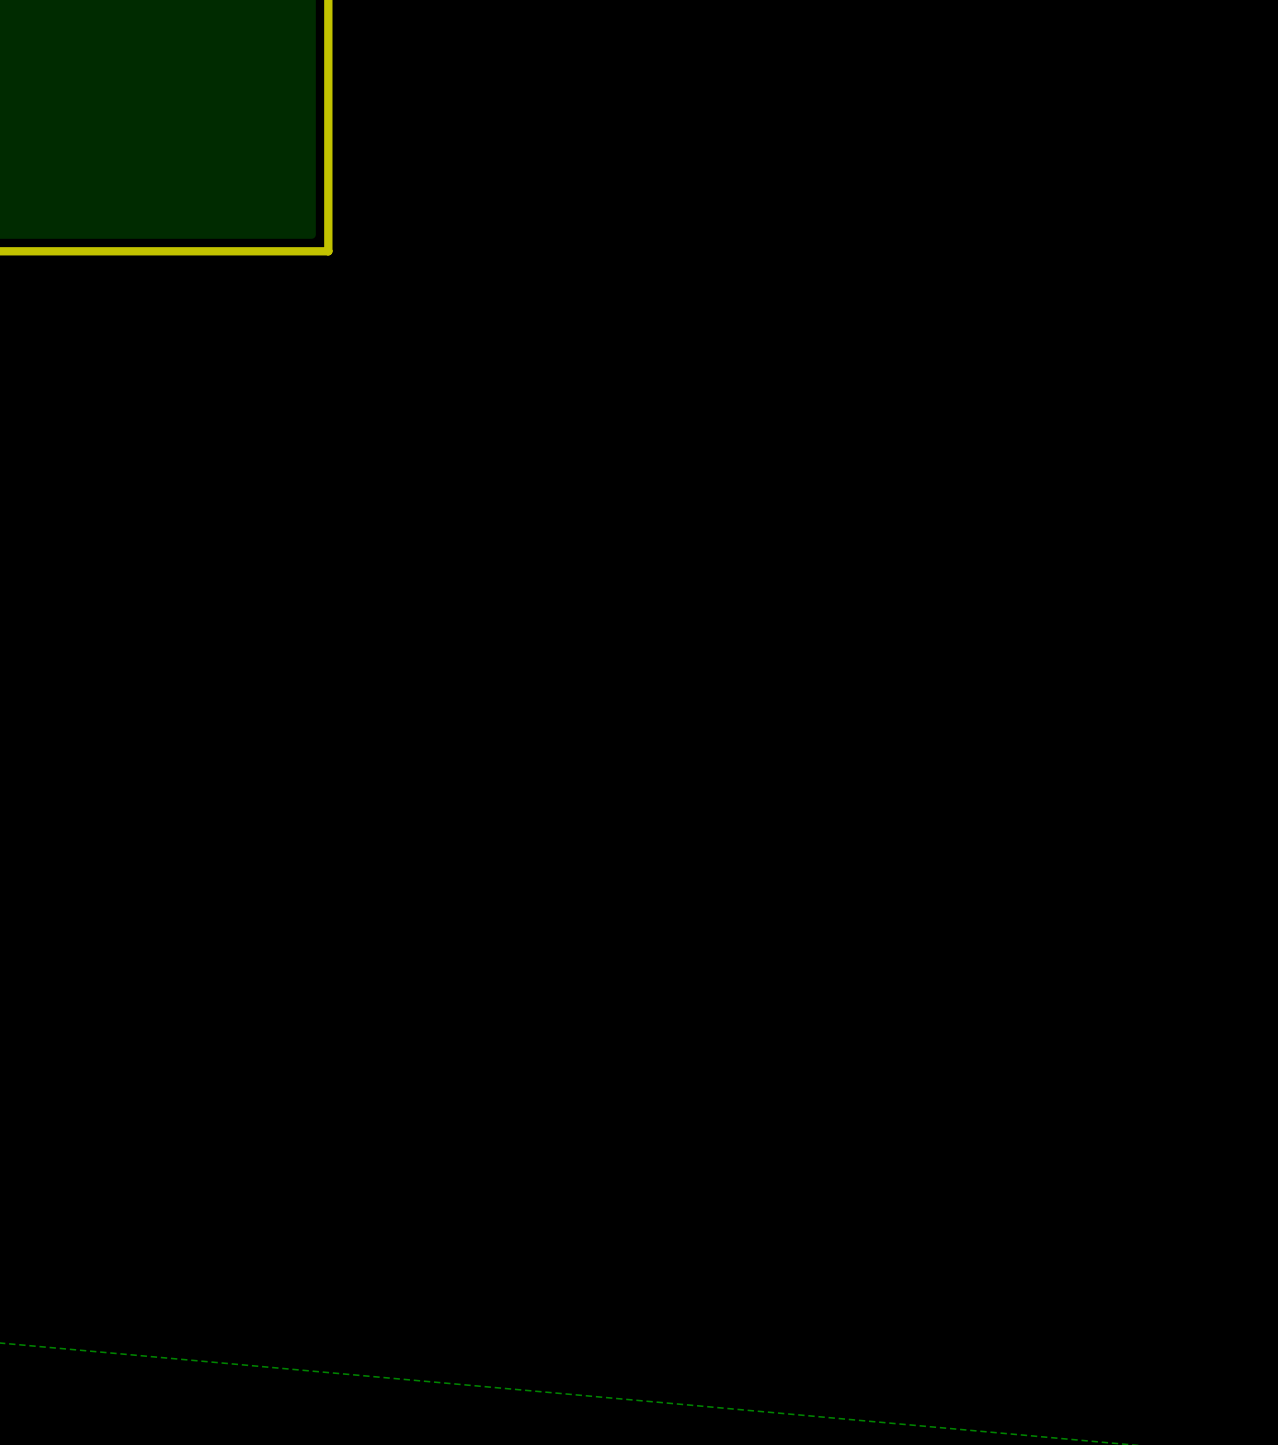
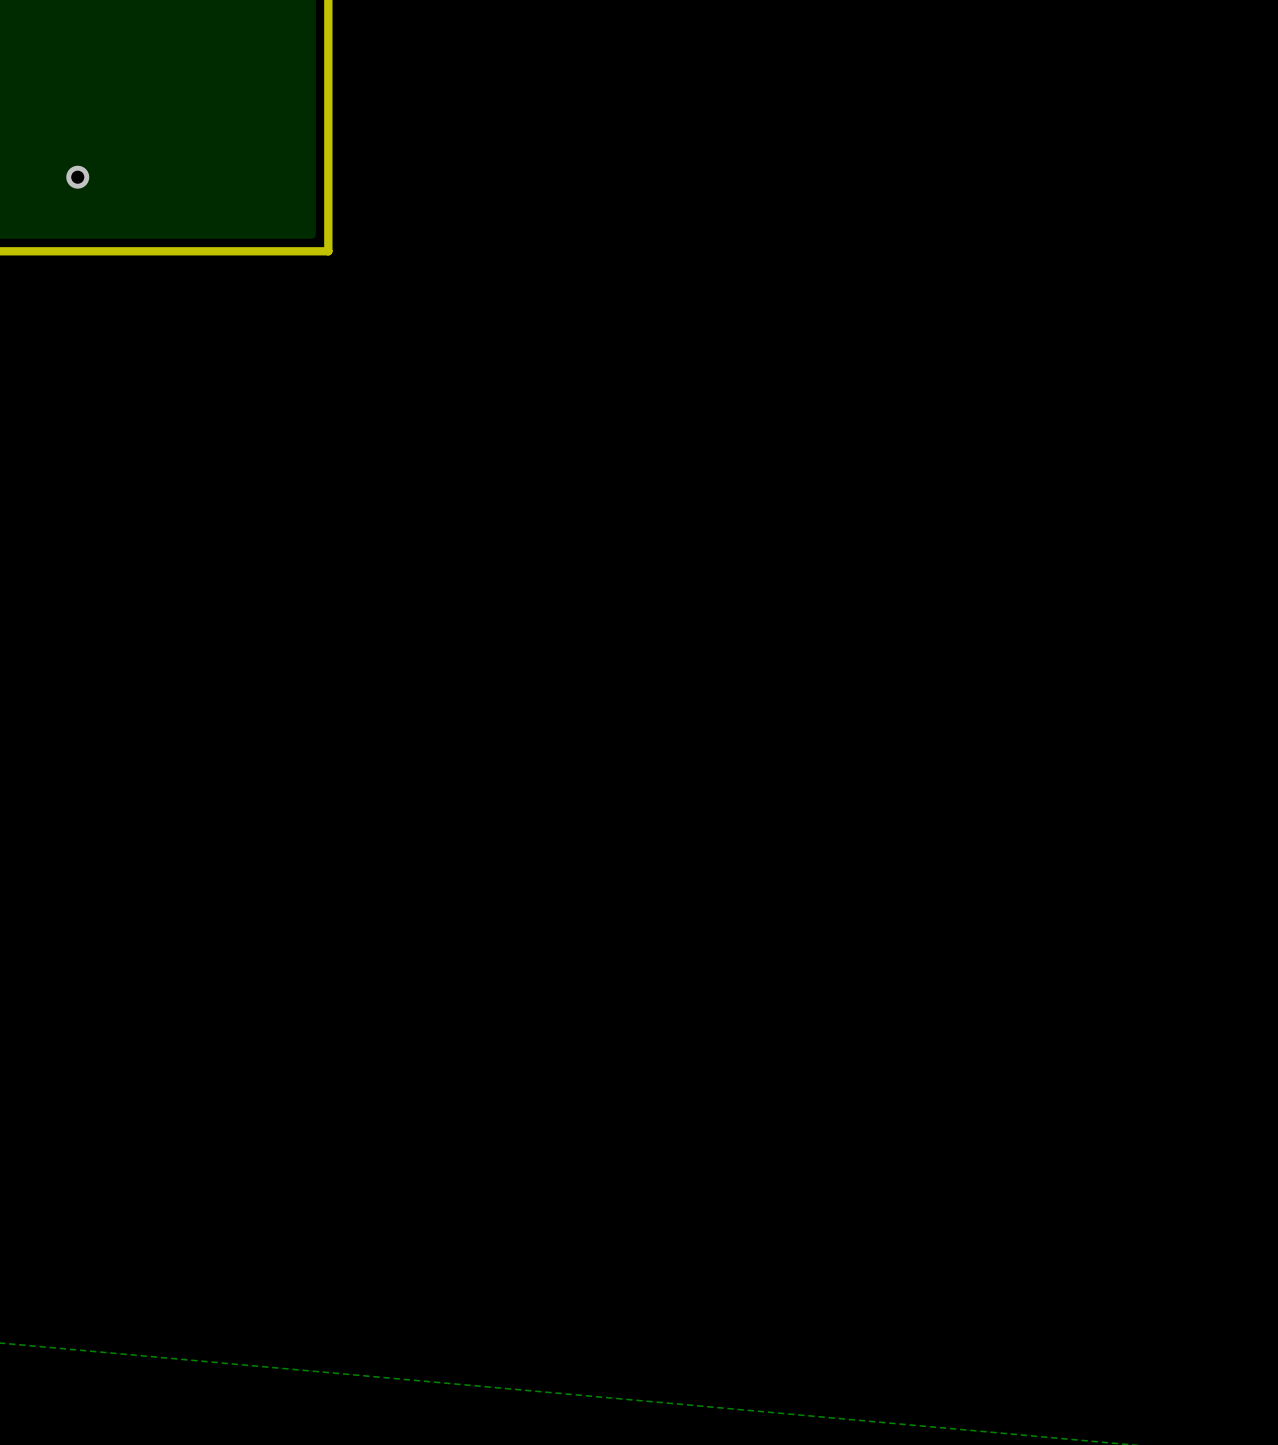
via: none -> (77, 177)

